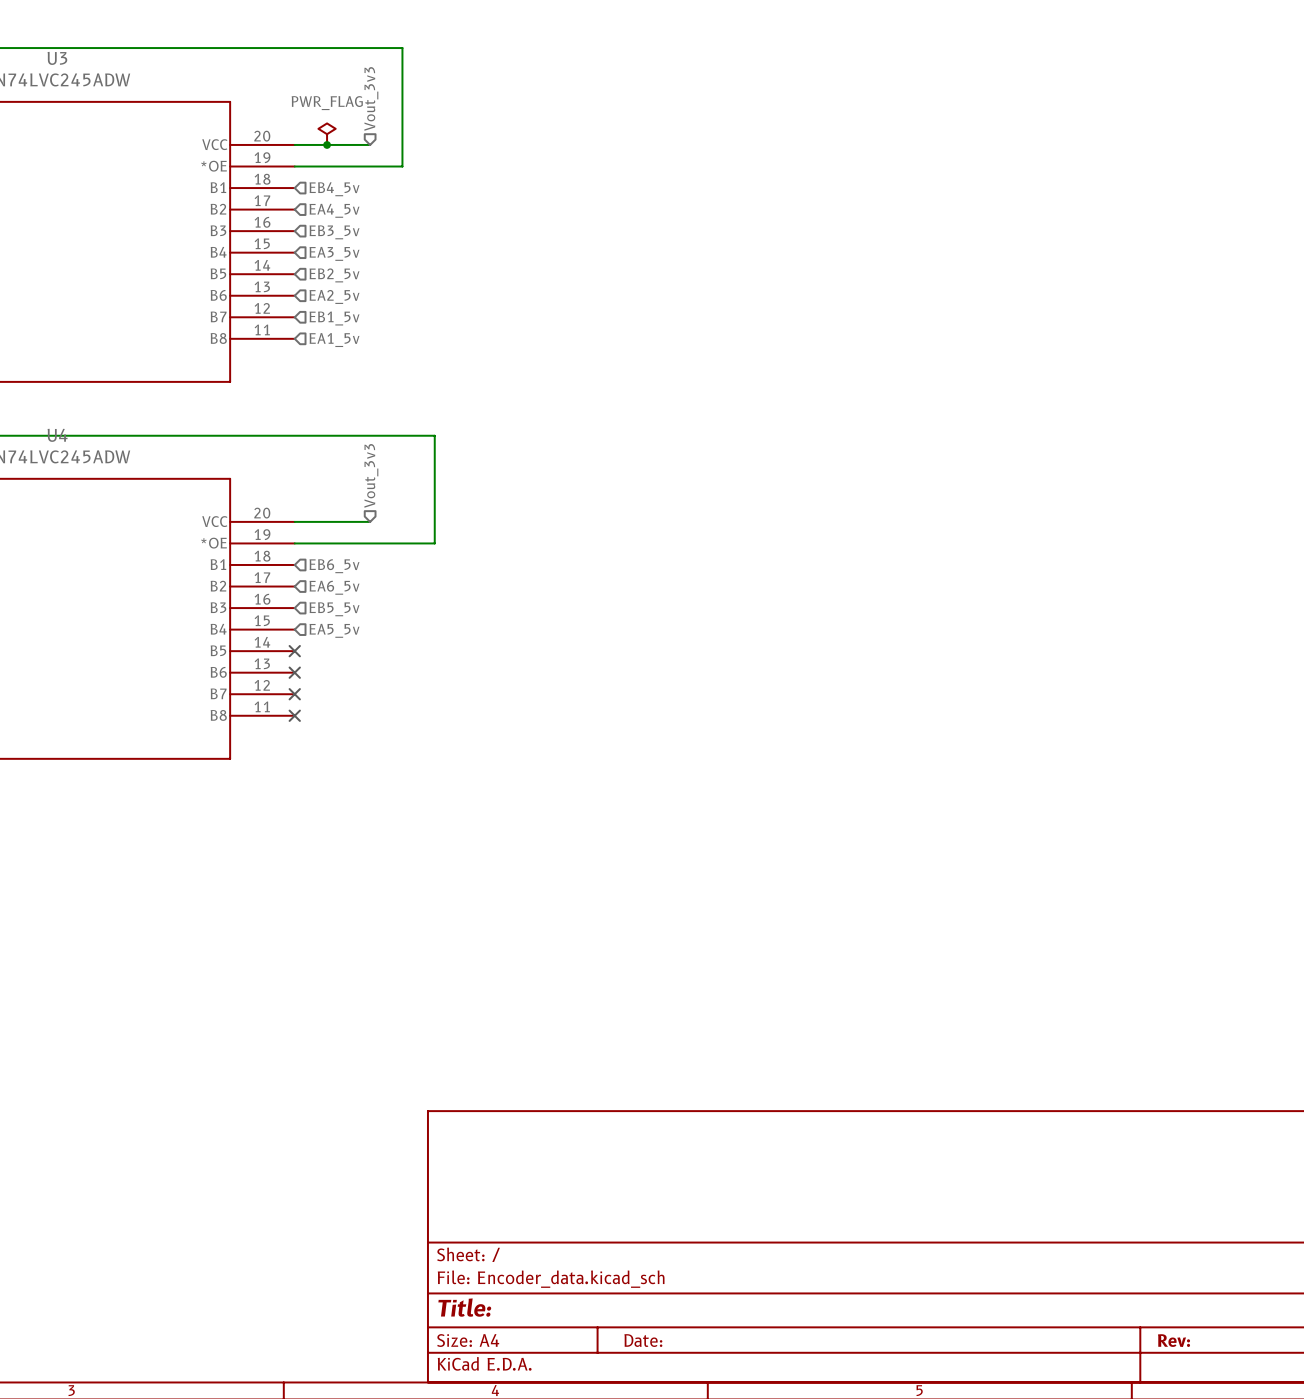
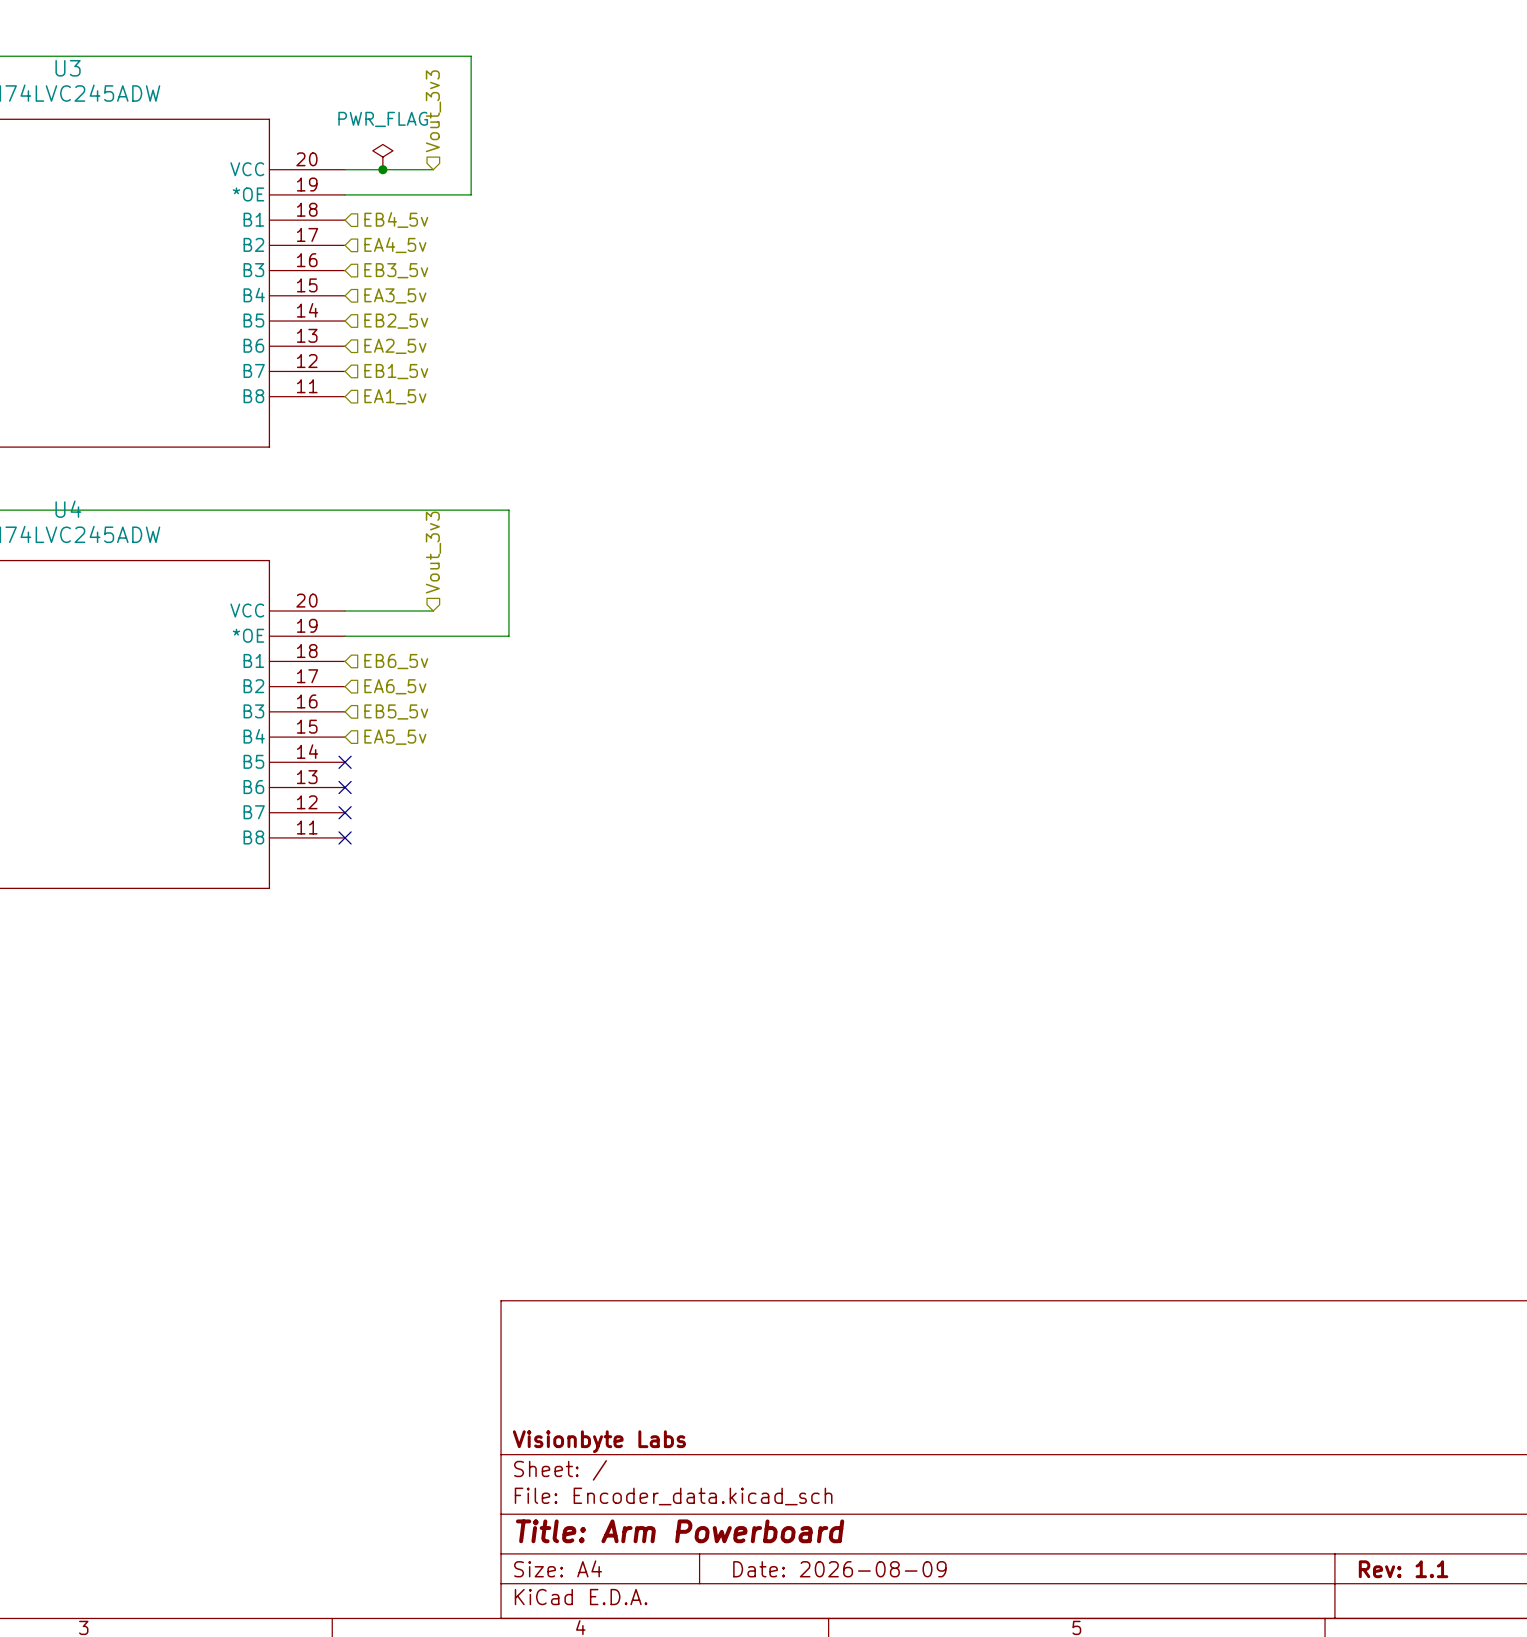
title block: none -> Visionbyte Labs (599, 1441)
title block: Title: (464, 1307) -> Title: Arm Powerboard (680, 1531)
title block: Date: (643, 1340) -> Date: 2026-08-09 (839, 1569)
title block: Rev: (1174, 1340) -> Rev: 1.1 (1403, 1569)

